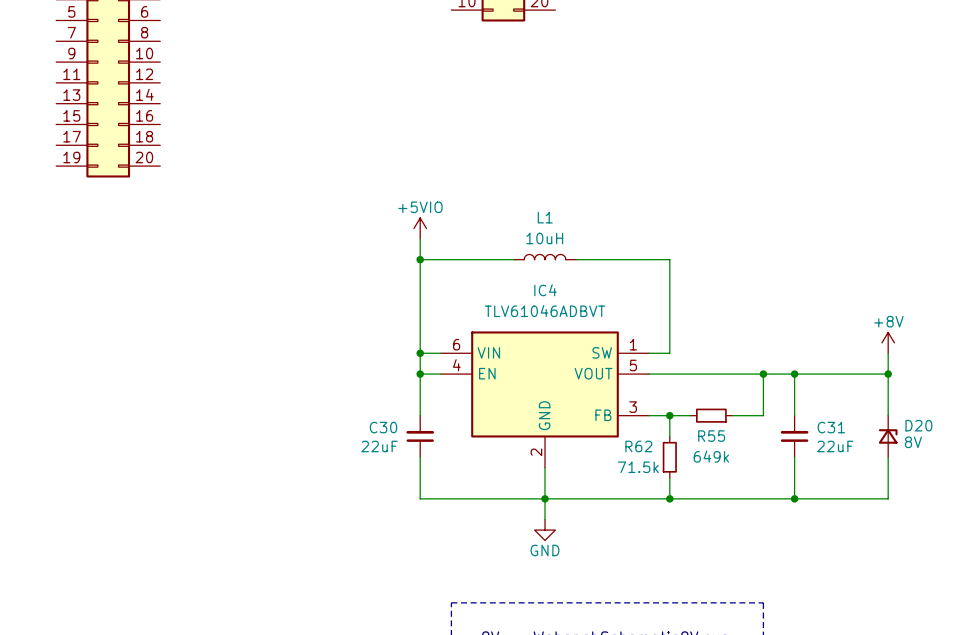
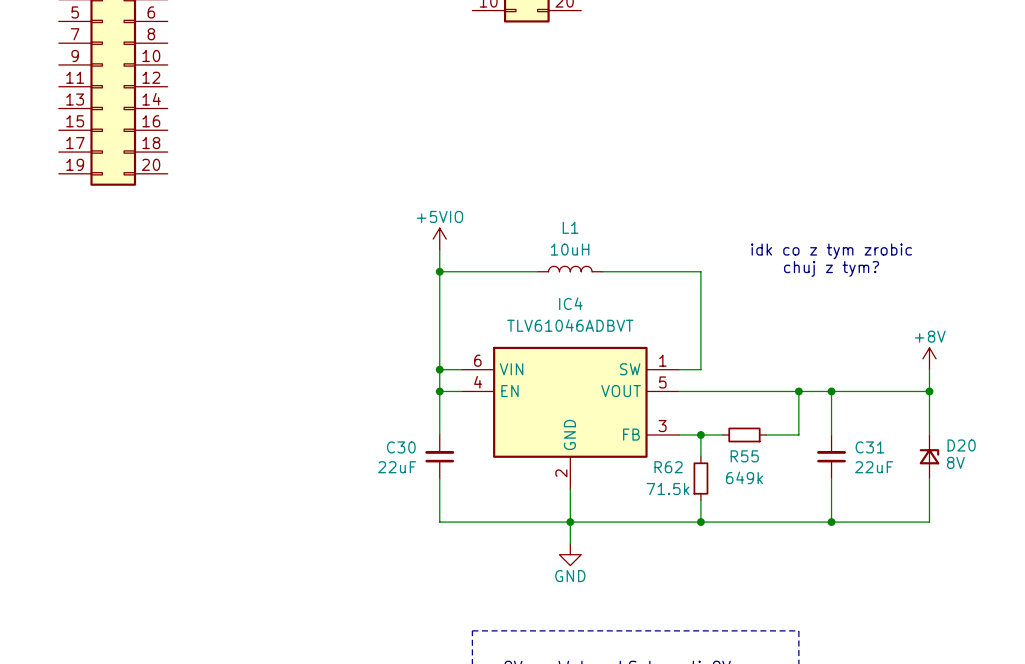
text: none -> idk co z tym zrobic (831, 251)
text: none -> chuj z tym? (831, 268)

